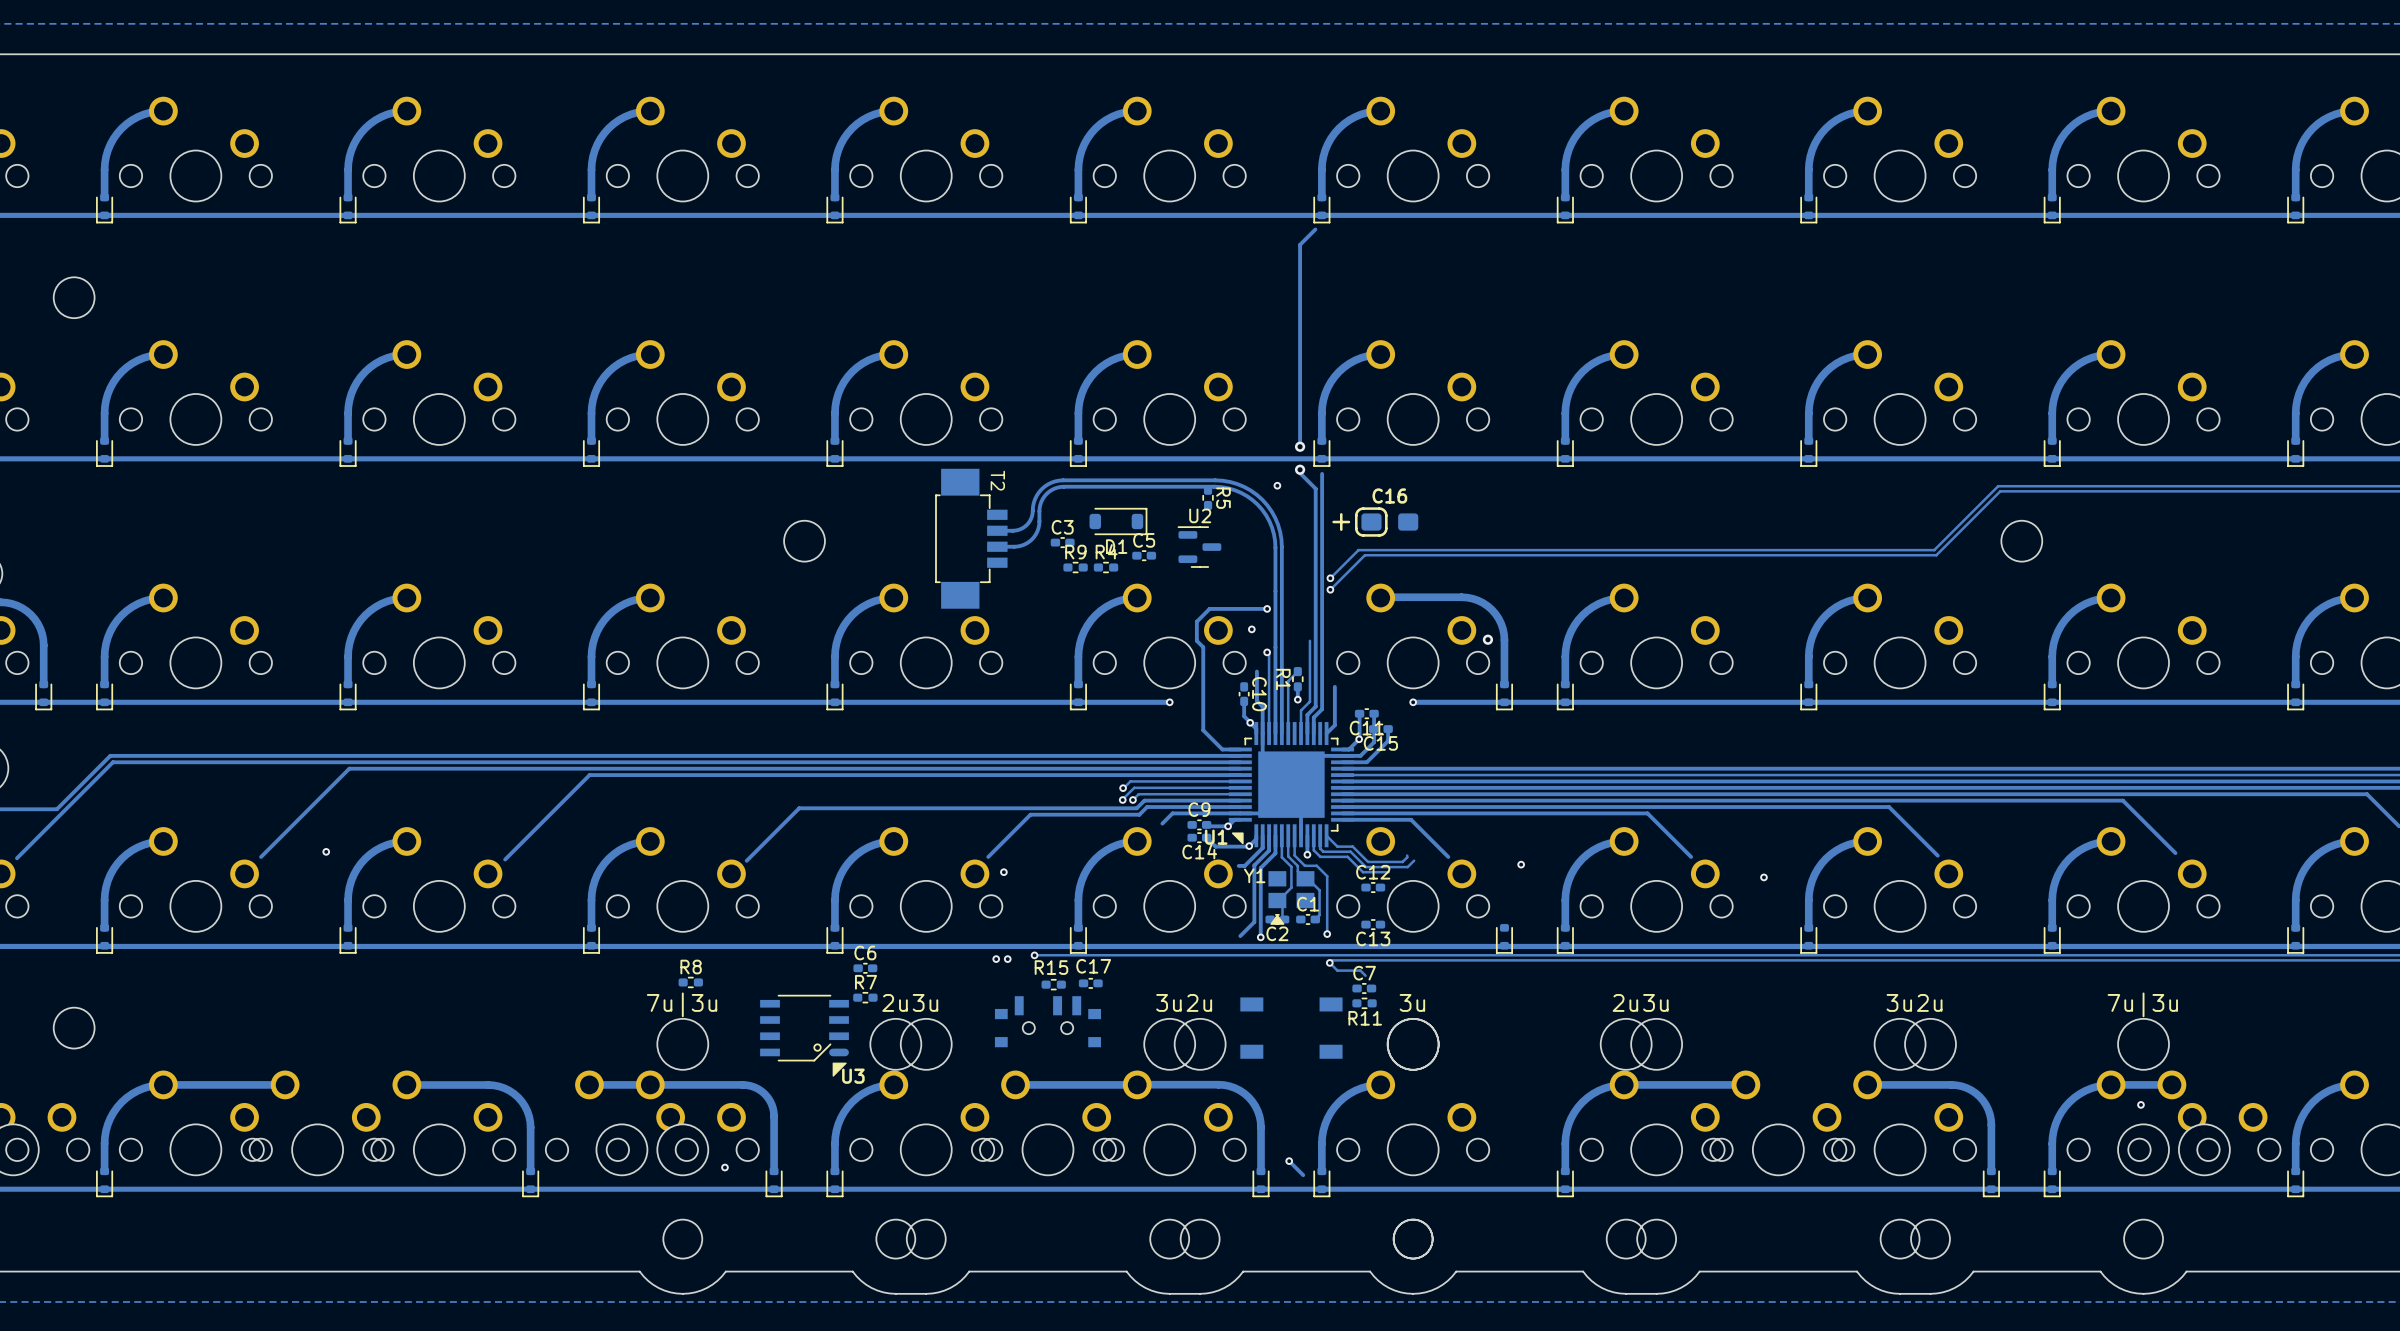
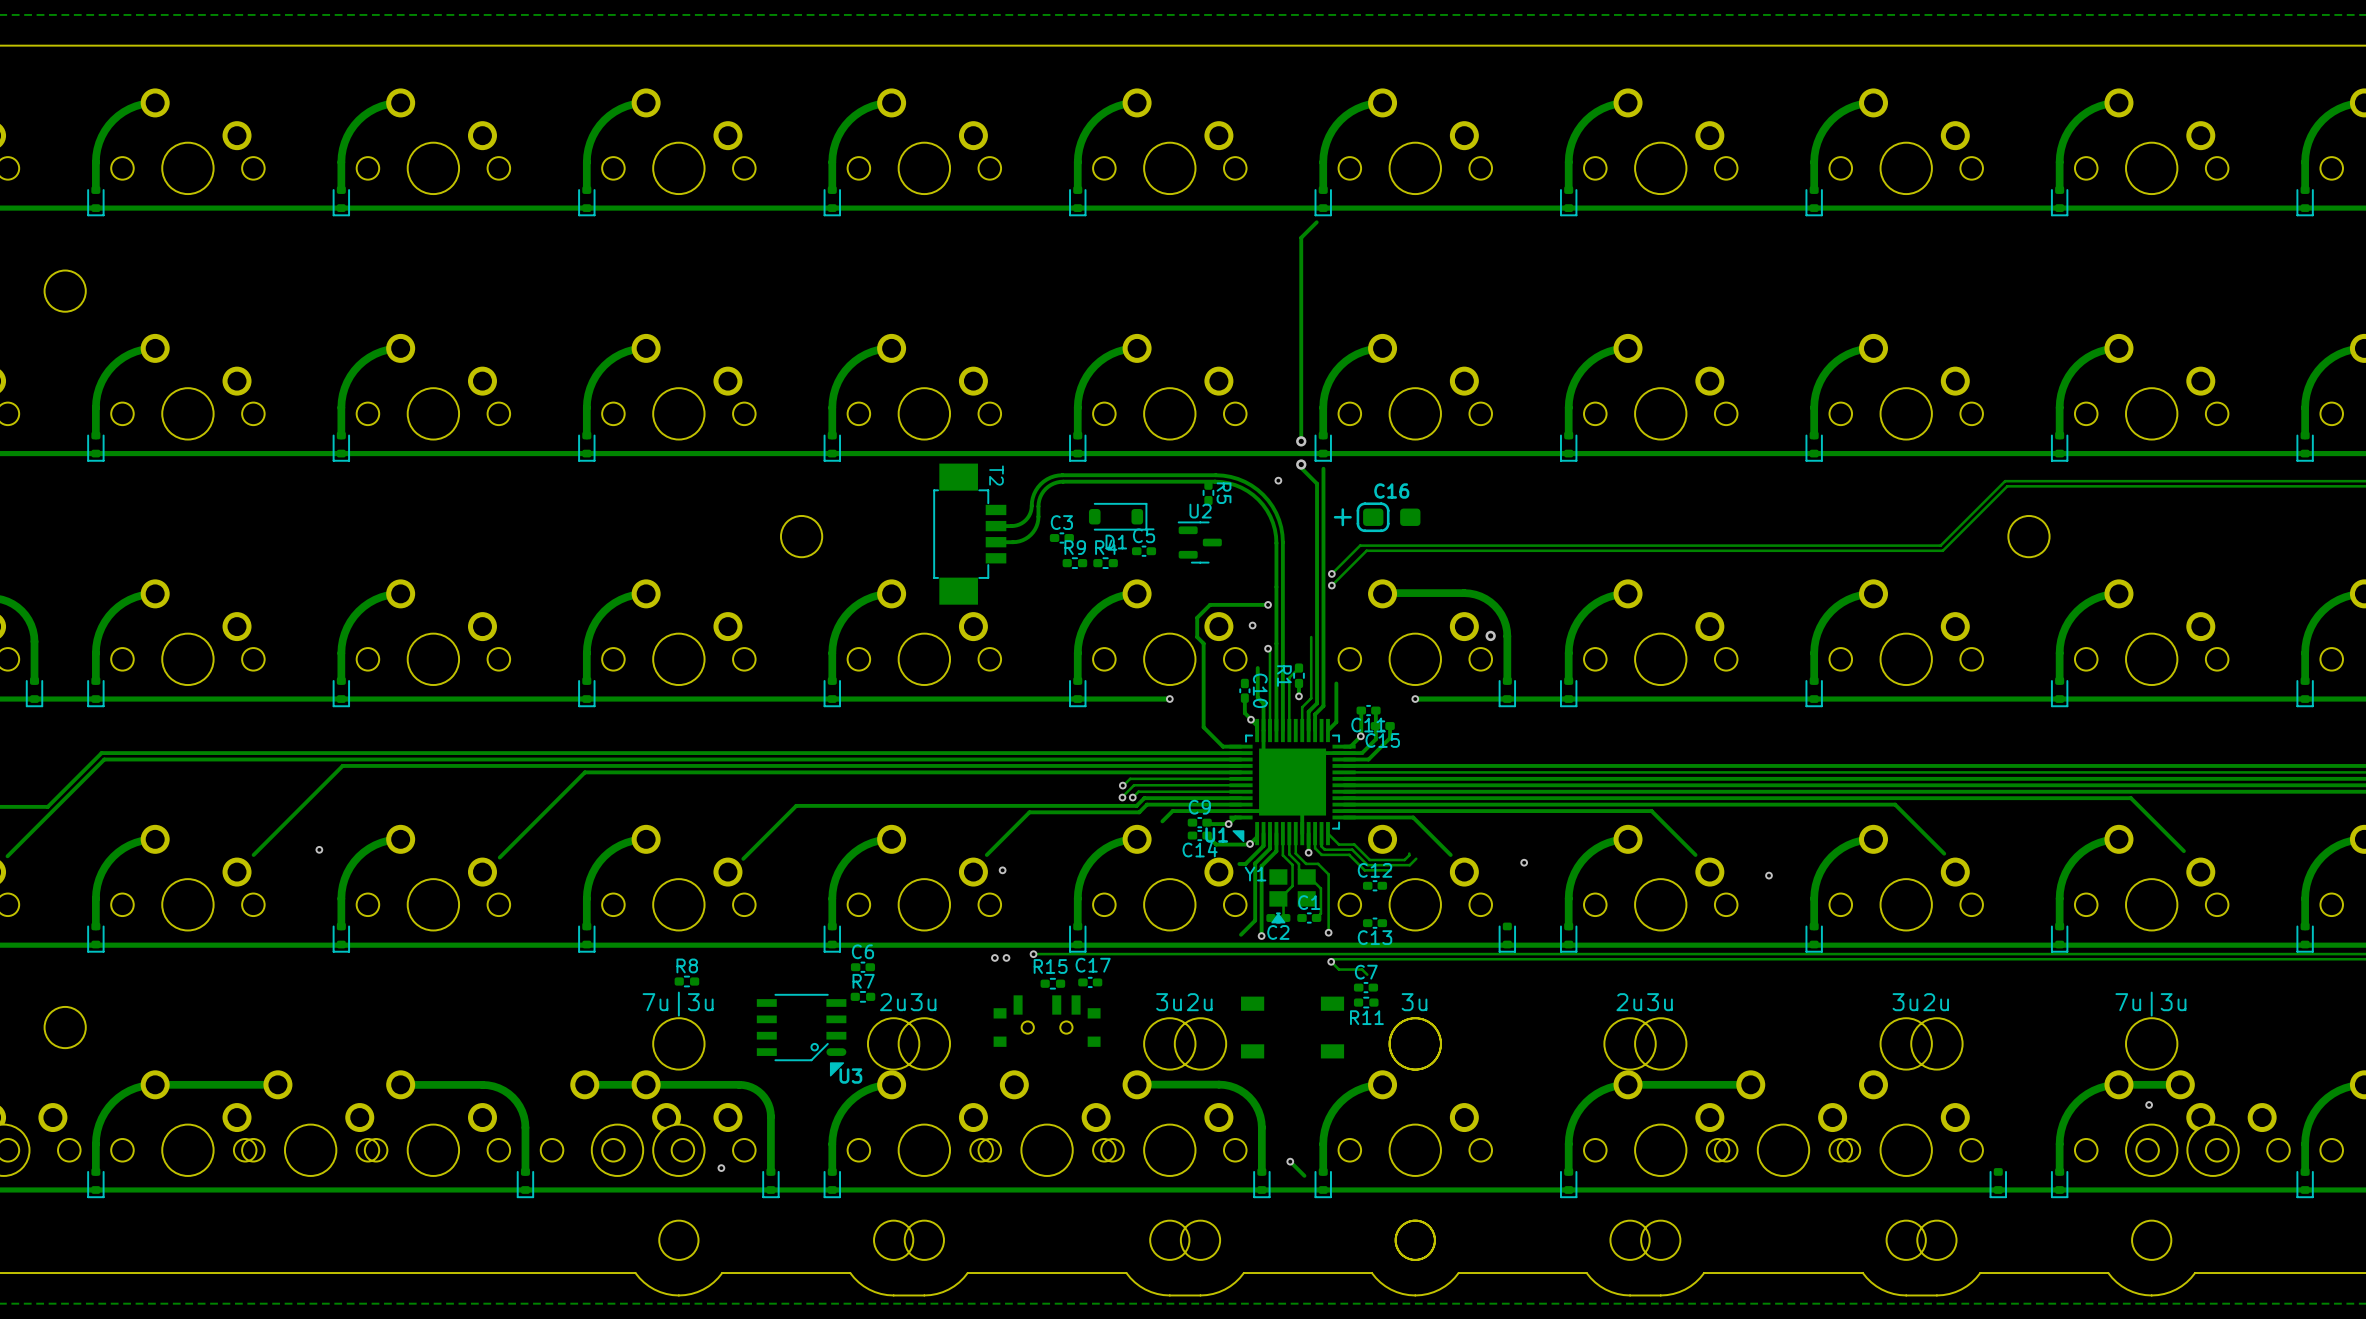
track: (1137, 1084) (1015, 1084) -> none
track: (1867, 1084) (1956, 1085) (1975, 1093) (1983, 1100) (1990, 1114) (1991, 1171) -> none

